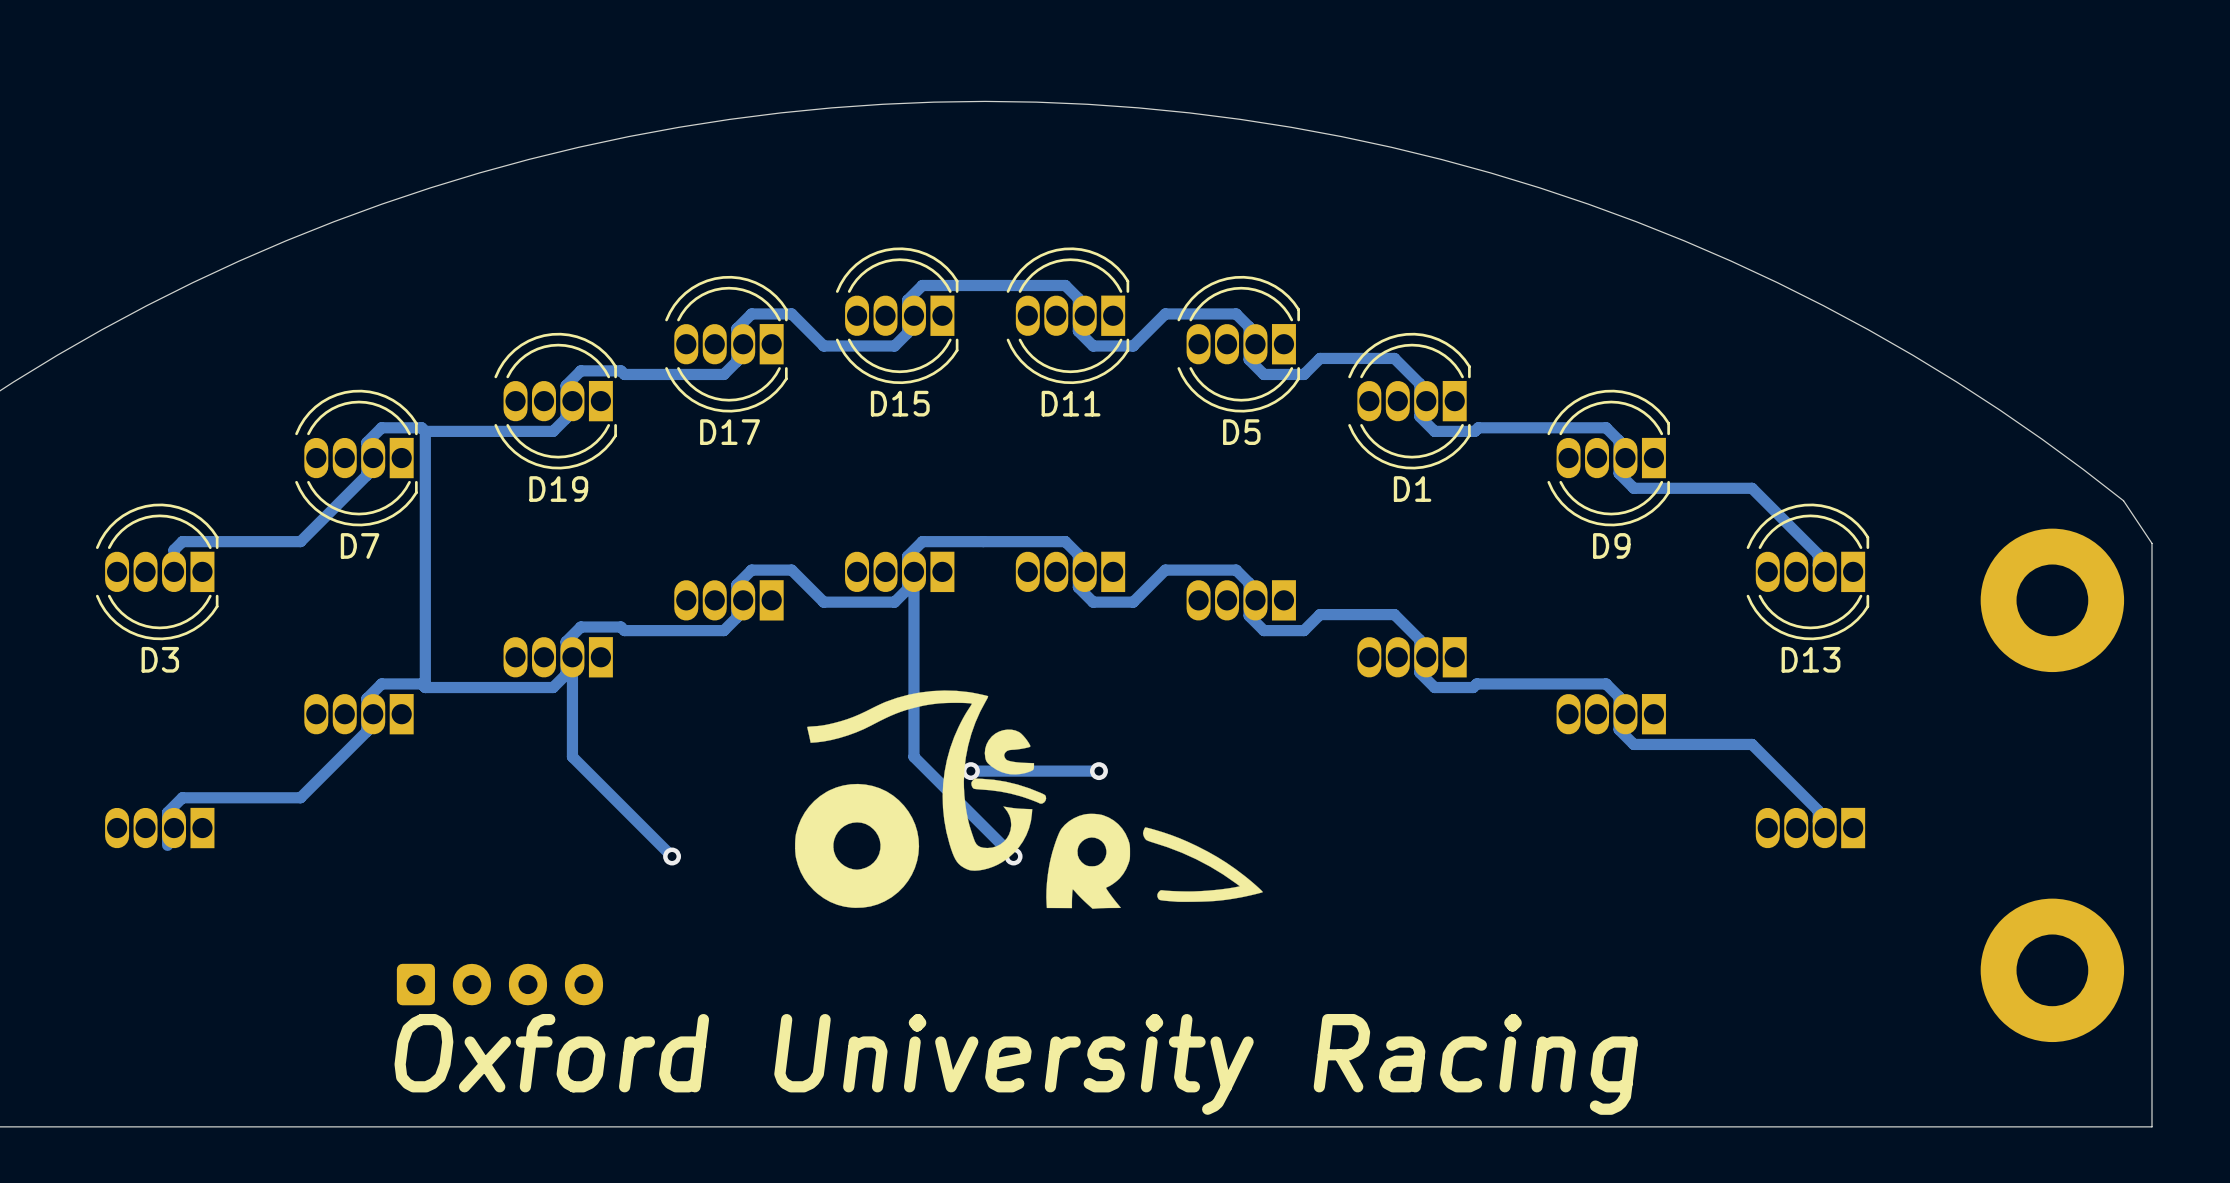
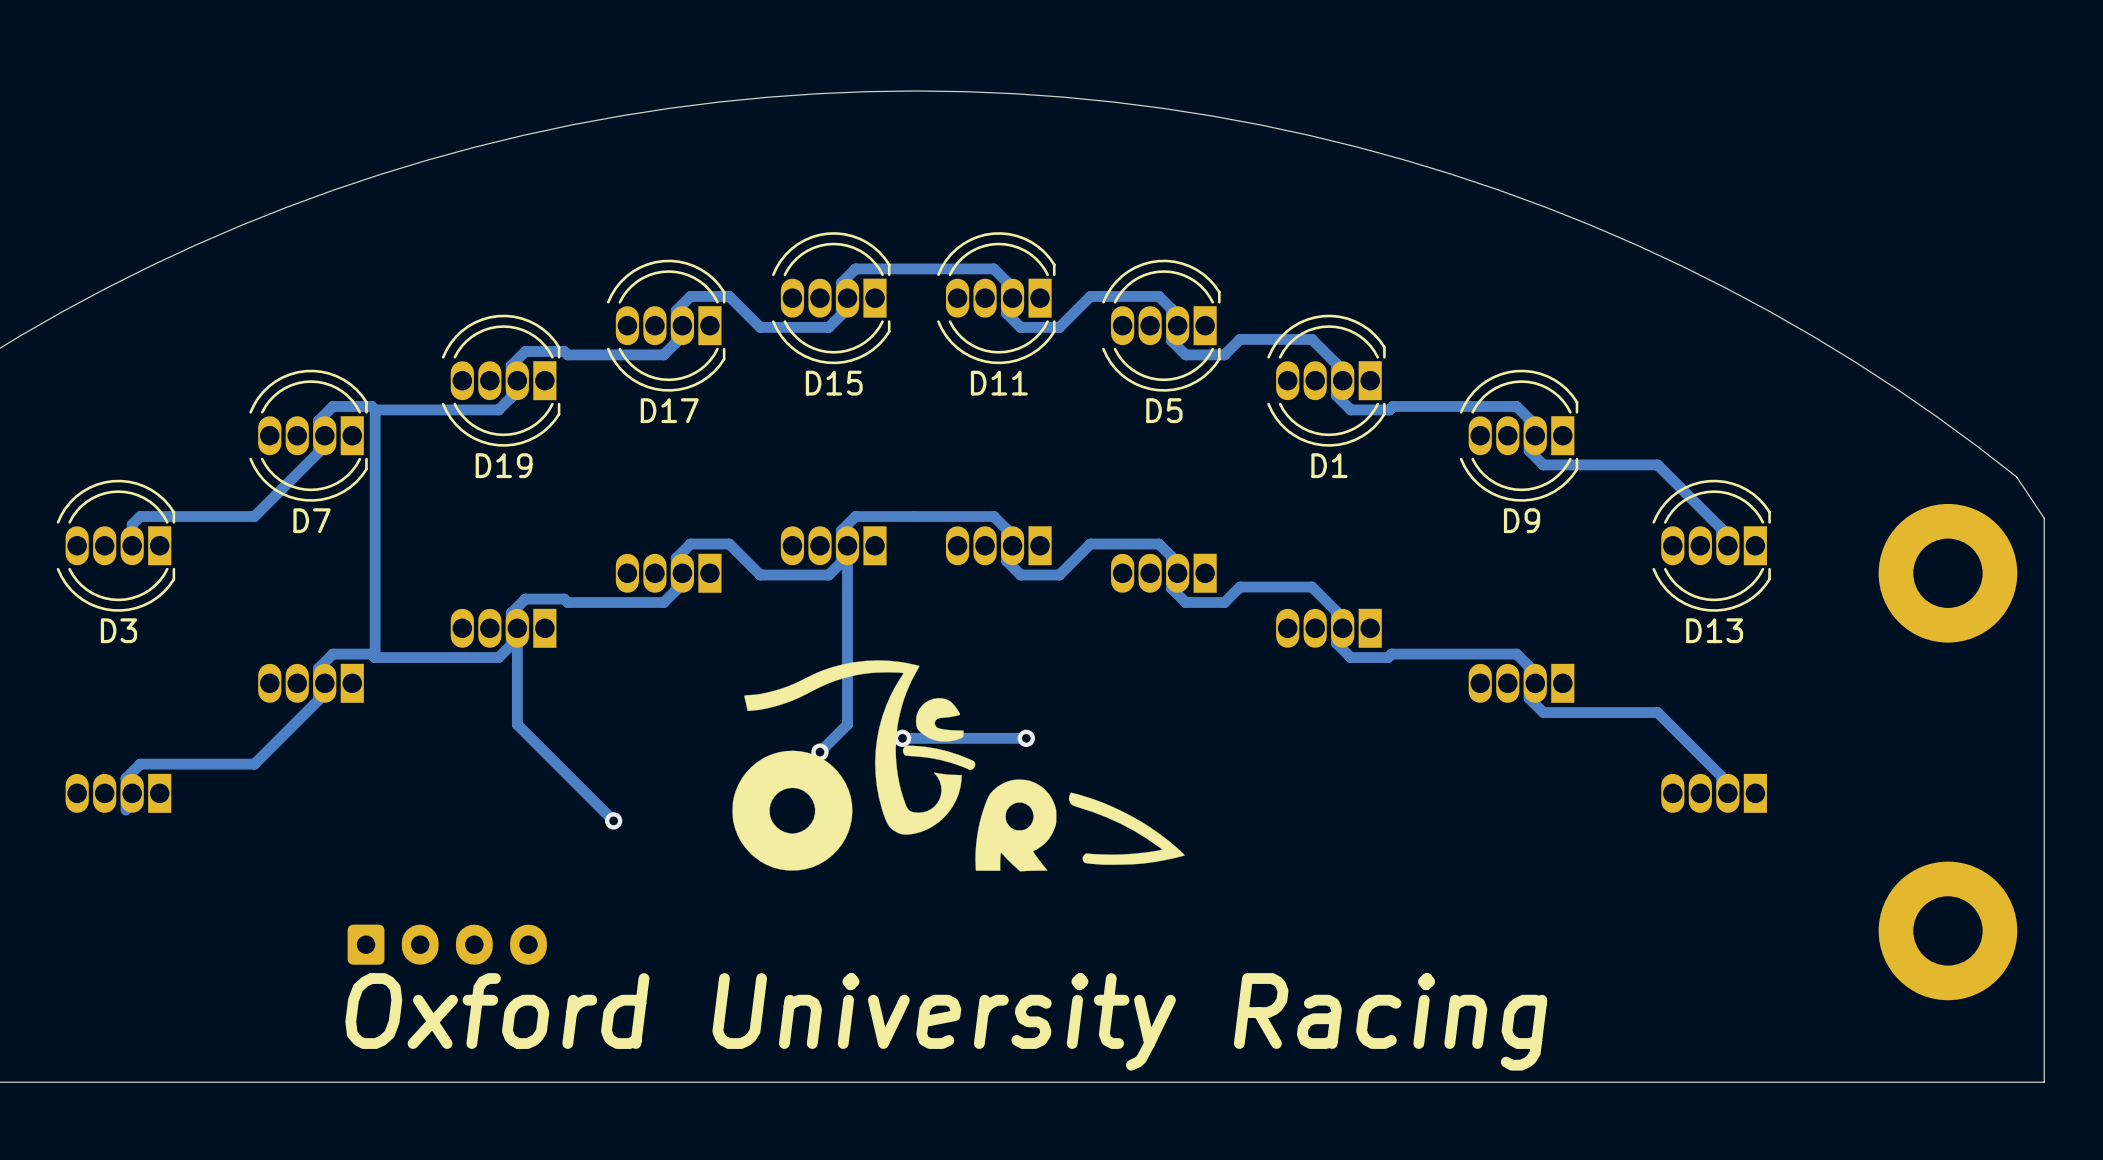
track: (913, 756) (1013, 856) -> (847, 724) (819, 752)
via: none -> (819, 752)
via: (1013, 856) -> none

